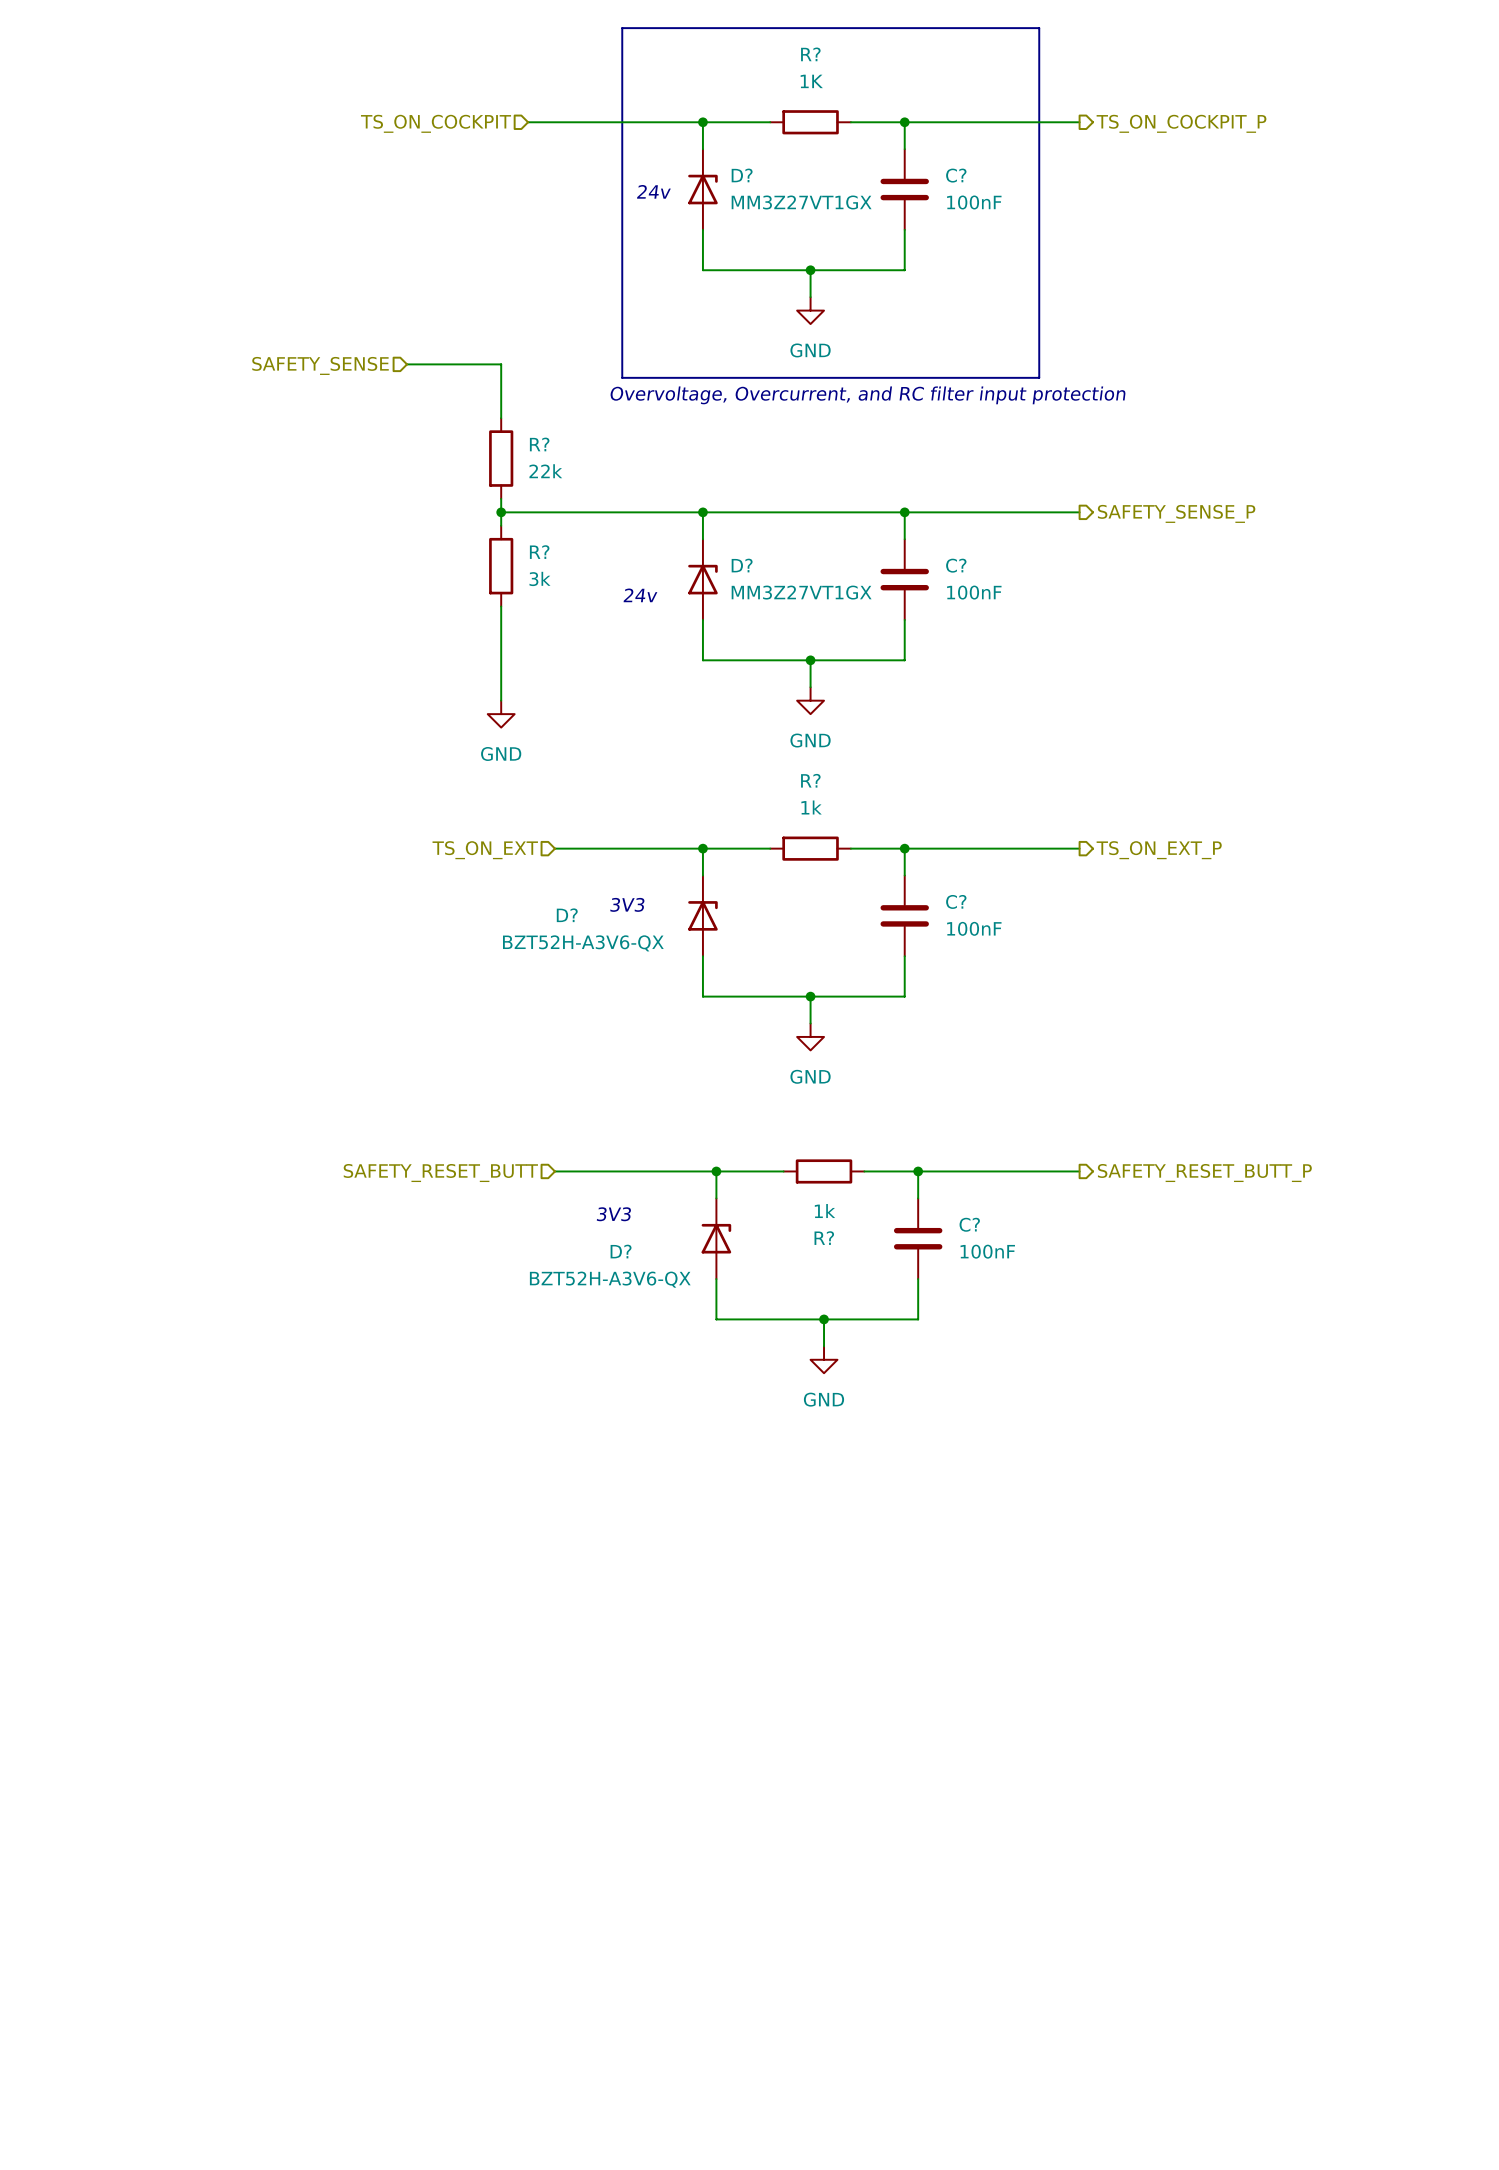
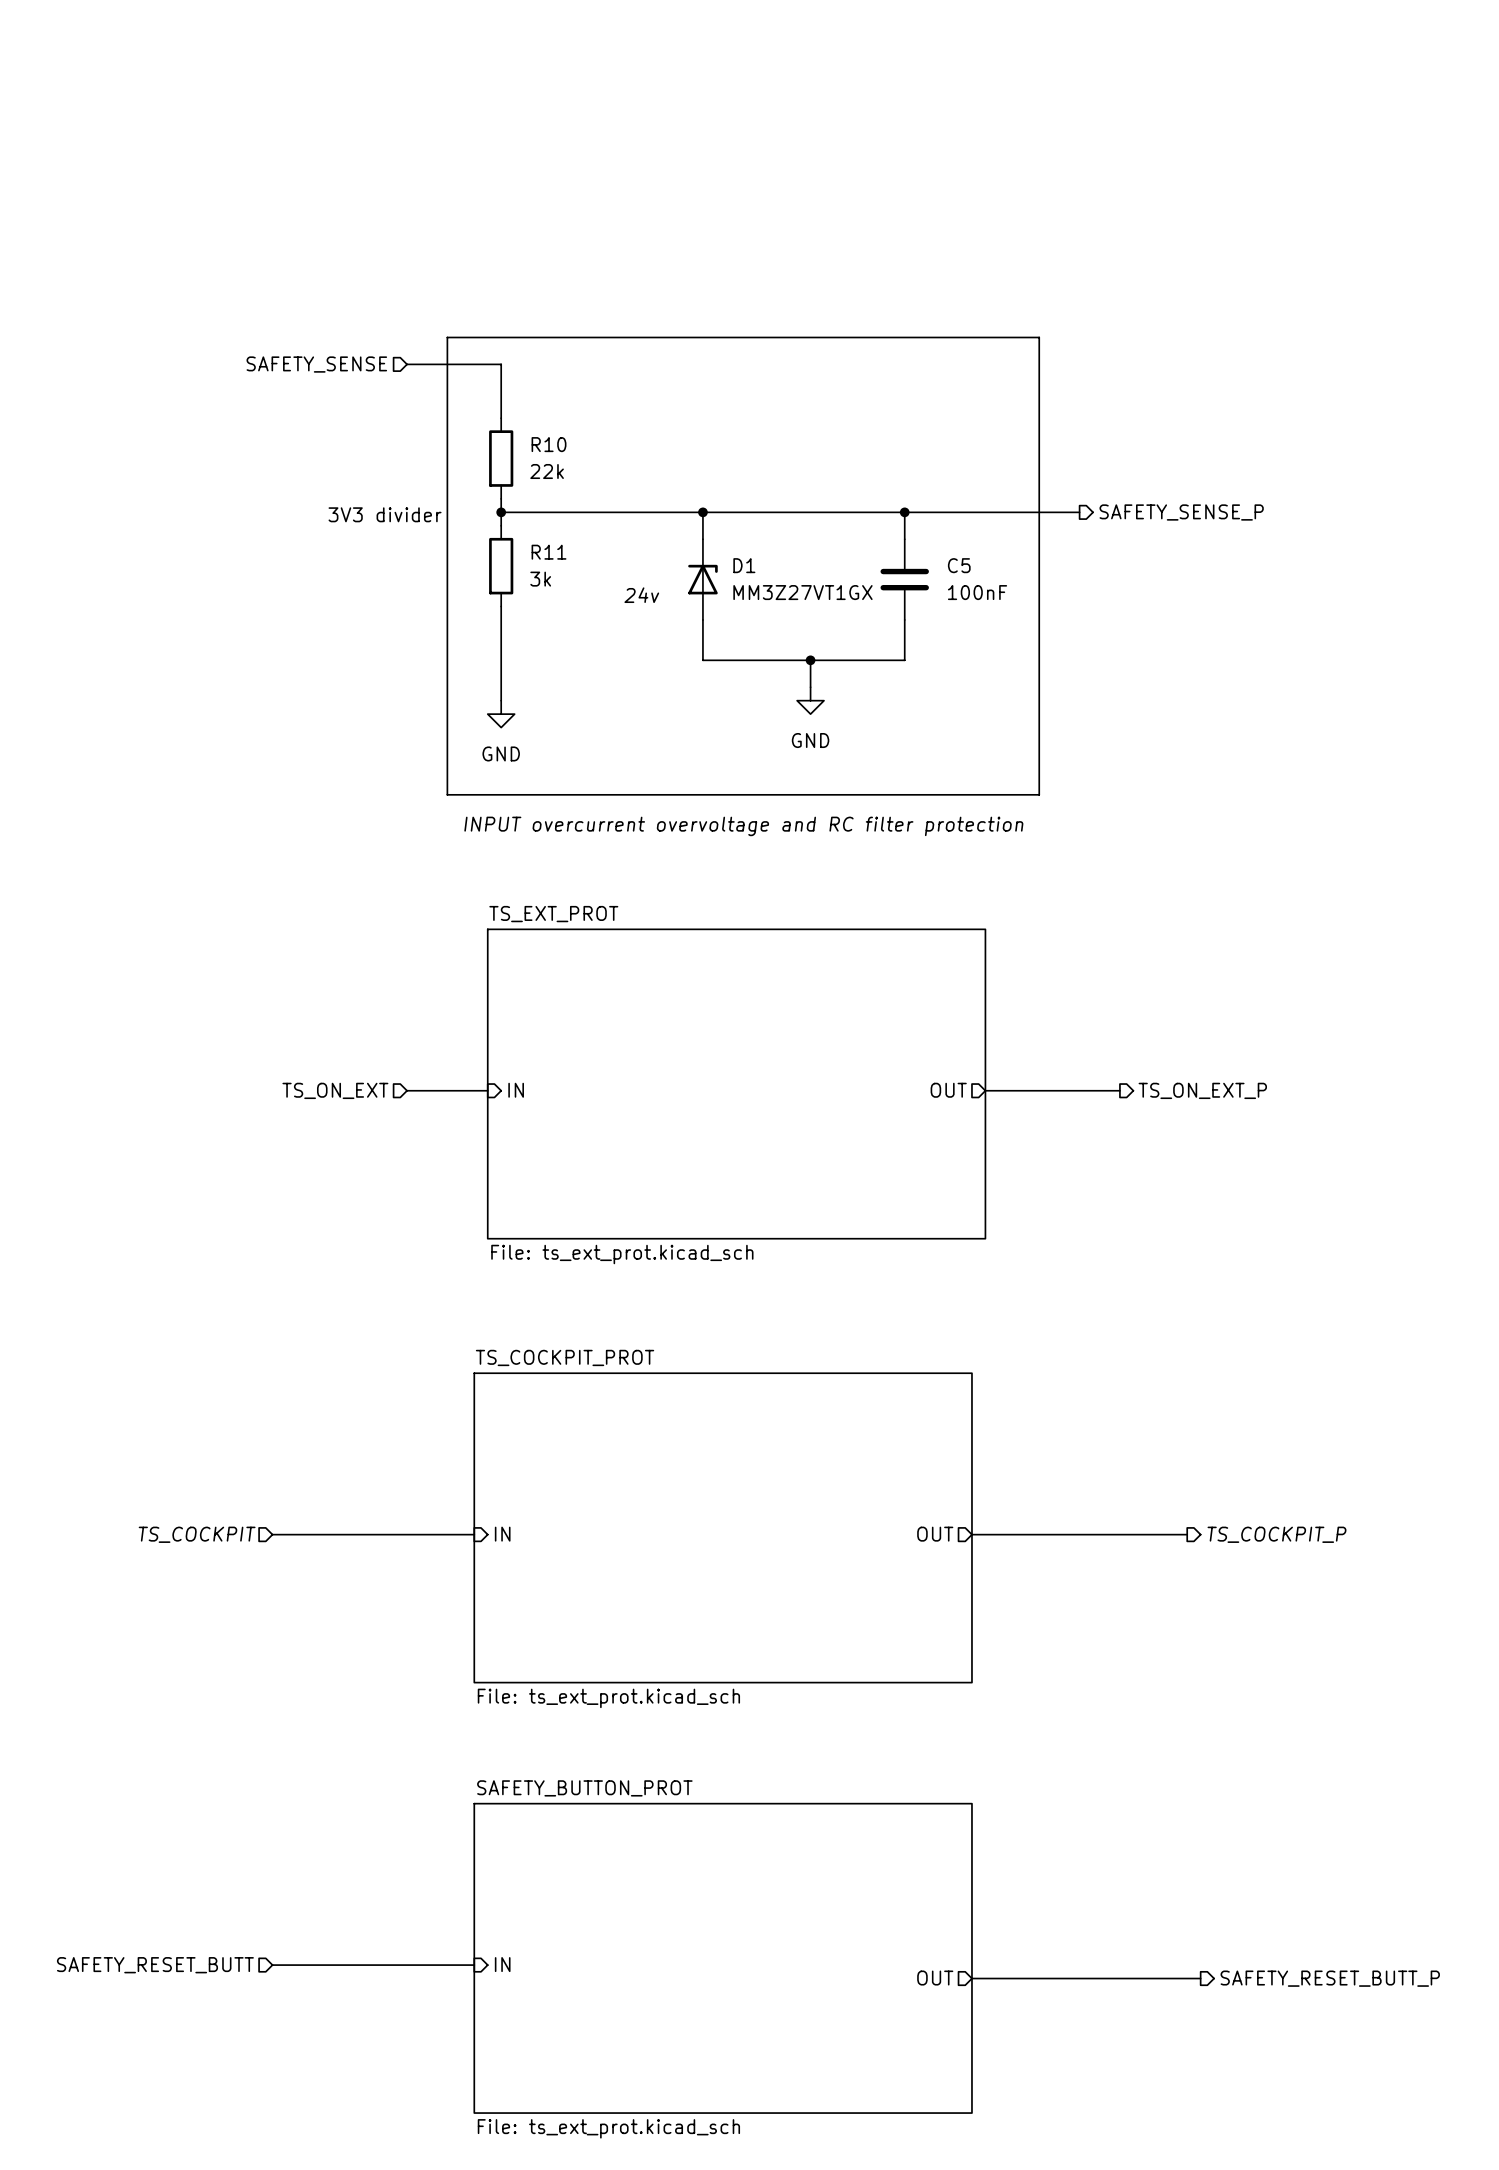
wire: (528, 122) (770, 122) -> none
wire: (702, 122) (702, 149) -> none
junction: (702, 122) -> none
R?: 1K (810, 122) -> none
wire: (850, 122) (1079, 122) -> none
wire: (904, 122) (904, 149) -> none
junction: (904, 122) -> none
hierarchical label: TS_ON_COCKPIT (436, 123) -> none
hierarchical label: TS_ON_COCKPIT_P (1181, 123) -> none
D?: MM3Z27VT1GX (702, 189) -> none
C?: 100nF (904, 189) -> none
text: 24v (653, 191) -> none
wire: (702, 229) (702, 270) (904, 270) (904, 229) -> none
wire: (810, 270) (810, 297) -> none
junction: (810, 270) -> none
power symbol: GND (810, 310) -> none
line: (1039, 337) (1039, 28) (622, 28) (622, 377) (1039, 377) -> (1039, 337) (447, 337) (447, 794) (1039, 794) (1039, 377)
text: Overvoltage, Overcurrent, and RC filter input protection (867, 395) -> none
R? name: R? (539, 444) -> R10 (549, 444)
text: none -> 3V3 divider (385, 514)
R? name: R? (539, 552) -> R11 (549, 552)
D? name: D? (742, 565) -> D1 (744, 565)
C? name: C? (956, 565) -> C5 (959, 565)
text: none -> INPUT overcurrent overvoltage and RC filter protection (743, 826)
wire: (554, 848) (770, 848) -> none
wire: (702, 848) (702, 875) -> none
junction: (702, 848) -> none
R?: 1k (810, 848) -> none
wire: (850, 848) (1079, 848) -> none
wire: (904, 848) (904, 875) -> none
junction: (904, 848) -> none
hierarchical label: TS_ON_EXT (485, 850) -> none
hierarchical label position: TS_ON_EXT_P (1159, 850) -> TS_ON_EXT_P (1202, 1090)
text: 3V3 (627, 904) -> none
D?: BZT52H-A3V6-QX (702, 915) -> none
C?: 100nF (904, 915) -> none
wire: (702, 956) (702, 996) (904, 996) (904, 956) -> none
wire: (810, 996) (810, 1023) -> none
junction: (810, 996) -> none
power symbol: GND (810, 1036) -> none
sheet TS_EXT_PROT: none -> File: ts_ext_prot.kicad_sch (736, 1084)
wire: none -> (407, 1090) (487, 1090)
sheet pin: none -> IN (516, 1090)
sheet pin: none -> OUT (948, 1090)
wire: none -> (985, 1090) (1119, 1090)
hierarchical label: none -> TS_ON_EXT (335, 1090)
wire: (554, 1171) (783, 1171) -> none
wire: (716, 1171) (716, 1198) -> none
junction: (716, 1171) -> none
R?: 1k (824, 1171) -> none
wire: (864, 1171) (1079, 1171) -> none
wire: (918, 1171) (918, 1198) -> none
junction: (918, 1171) -> none
hierarchical label: SAFETY_RESET_BUTT (440, 1173) -> none
hierarchical label: SAFETY_RESET_BUTT_P (1204, 1173) -> none
text: 3V3 (613, 1214) -> none
D?: BZT52H-A3V6-QX (716, 1238) -> none
C?: 100nF (918, 1238) -> none
wire: (716, 1279) (716, 1319) (918, 1319) (918, 1279) -> none
wire: (824, 1319) (824, 1346) -> none
junction: (824, 1319) -> none
power symbol: GND (824, 1359) -> none
sheet TS_COCKPIT_PROT: none -> File: ts_ext_prot.kicad_sch (723, 1527)
wire: none -> (272, 1534) (474, 1534)
sheet pin: none -> IN (502, 1534)
sheet pin: none -> OUT (935, 1534)
wire: none -> (971, 1534) (1187, 1534)
hierarchical label: none -> TS_COCKPIT (197, 1534)
hierarchical label: none -> TS_COCKPIT_P (1277, 1534)
sheet SAFETY_BUTTON_PROT: none -> File: ts_ext_prot.kicad_sch (723, 1958)
sheet pin: none -> IN (502, 1964)
wire: none -> (272, 1965) (474, 1965)
hierarchical label: none -> SAFETY_RESET_BUTT (155, 1965)
sheet pin: none -> OUT (935, 1978)
wire: none -> (971, 1978) (1200, 1978)
hierarchical label: none -> SAFETY_RESET_BUTT_P (1330, 1978)

